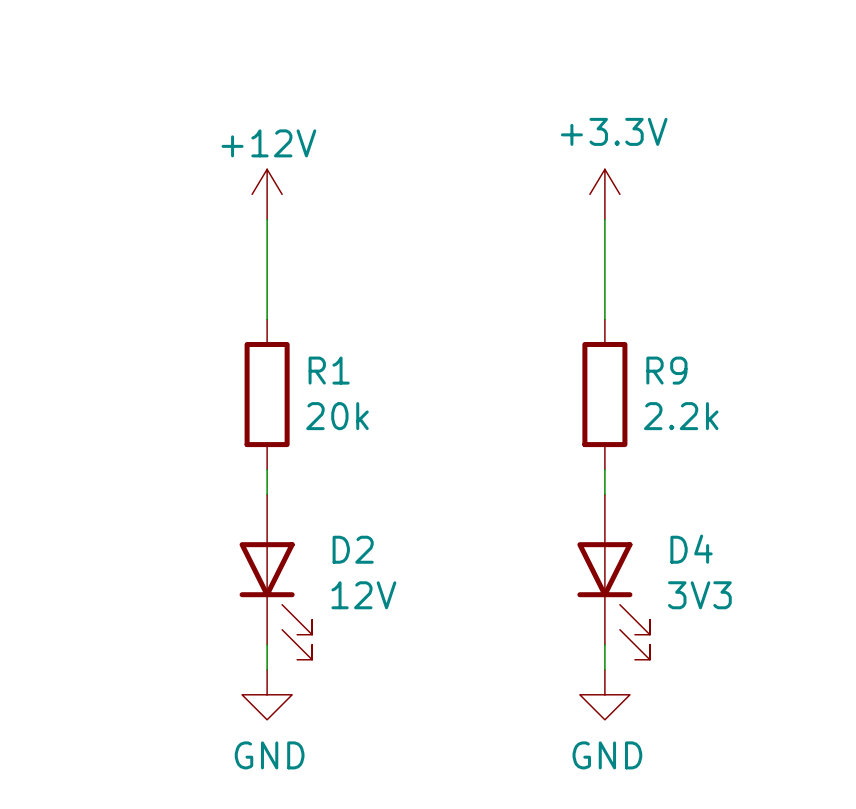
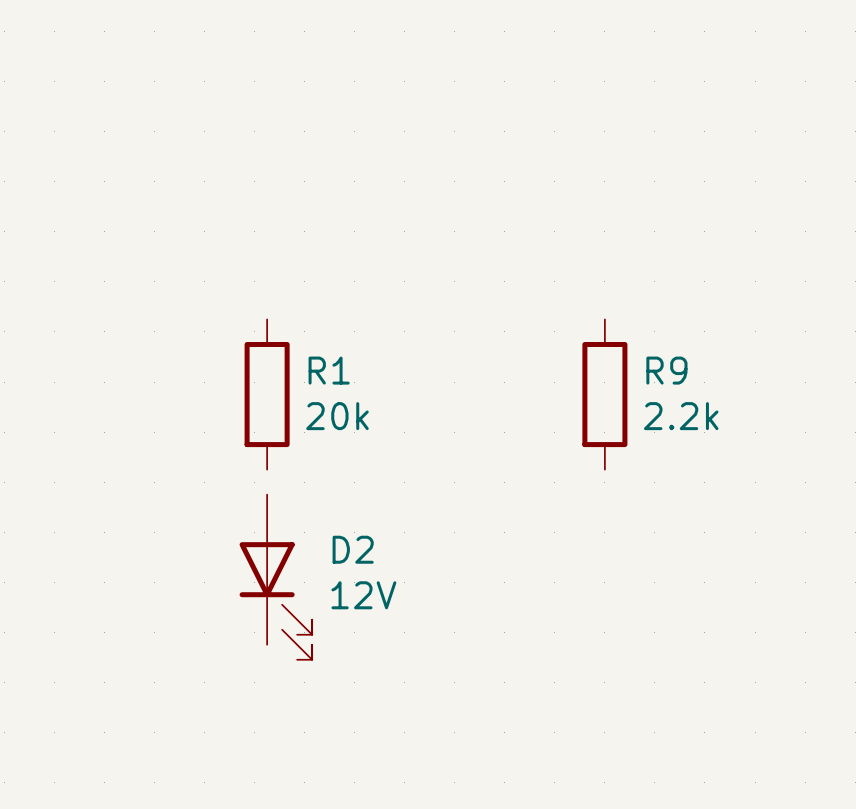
power symbol: +12V (267, 194) -> none
power symbol: +3.3V (604, 194) -> none
wire: (267, 219) (267, 319) -> none
wire: (604, 219) (604, 319) -> none
wire: (267, 469) (267, 494) -> none
wire: (604, 469) (604, 494) -> none
D4: 3V3 (613, 577) -> none
wire: (267, 644) (267, 669) -> none
wire: (604, 644) (604, 669) -> none
power symbol: GND (267, 694) -> none
power symbol: GND (604, 694) -> none

